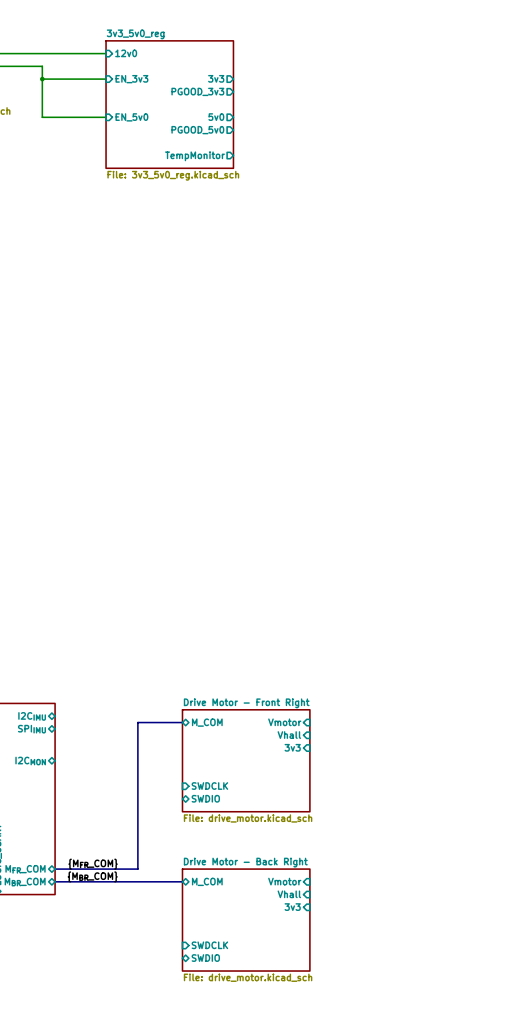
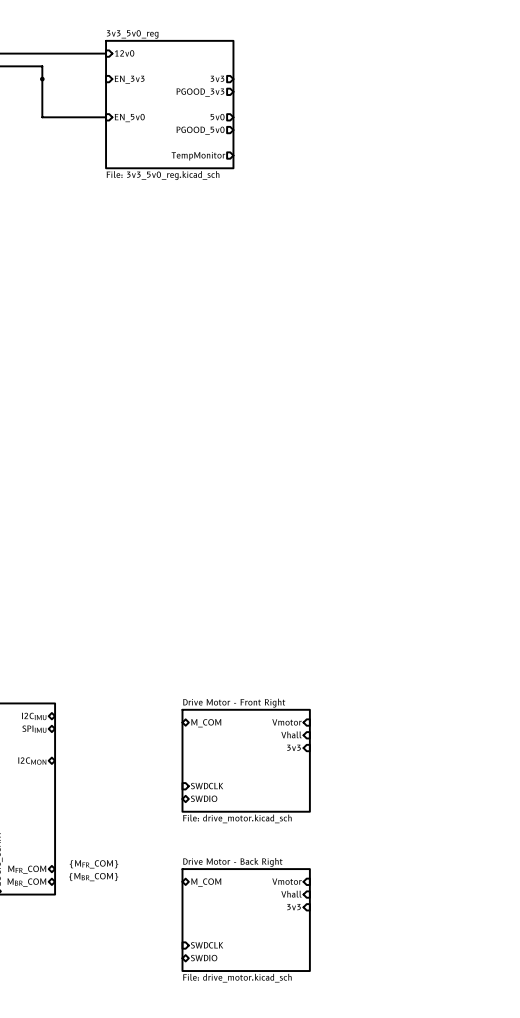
wire: (42, 79) (106, 79) -> none
bus: (182, 722) (137, 722) (137, 869) (55, 869) -> none
bus: (55, 881) (182, 881) -> none

